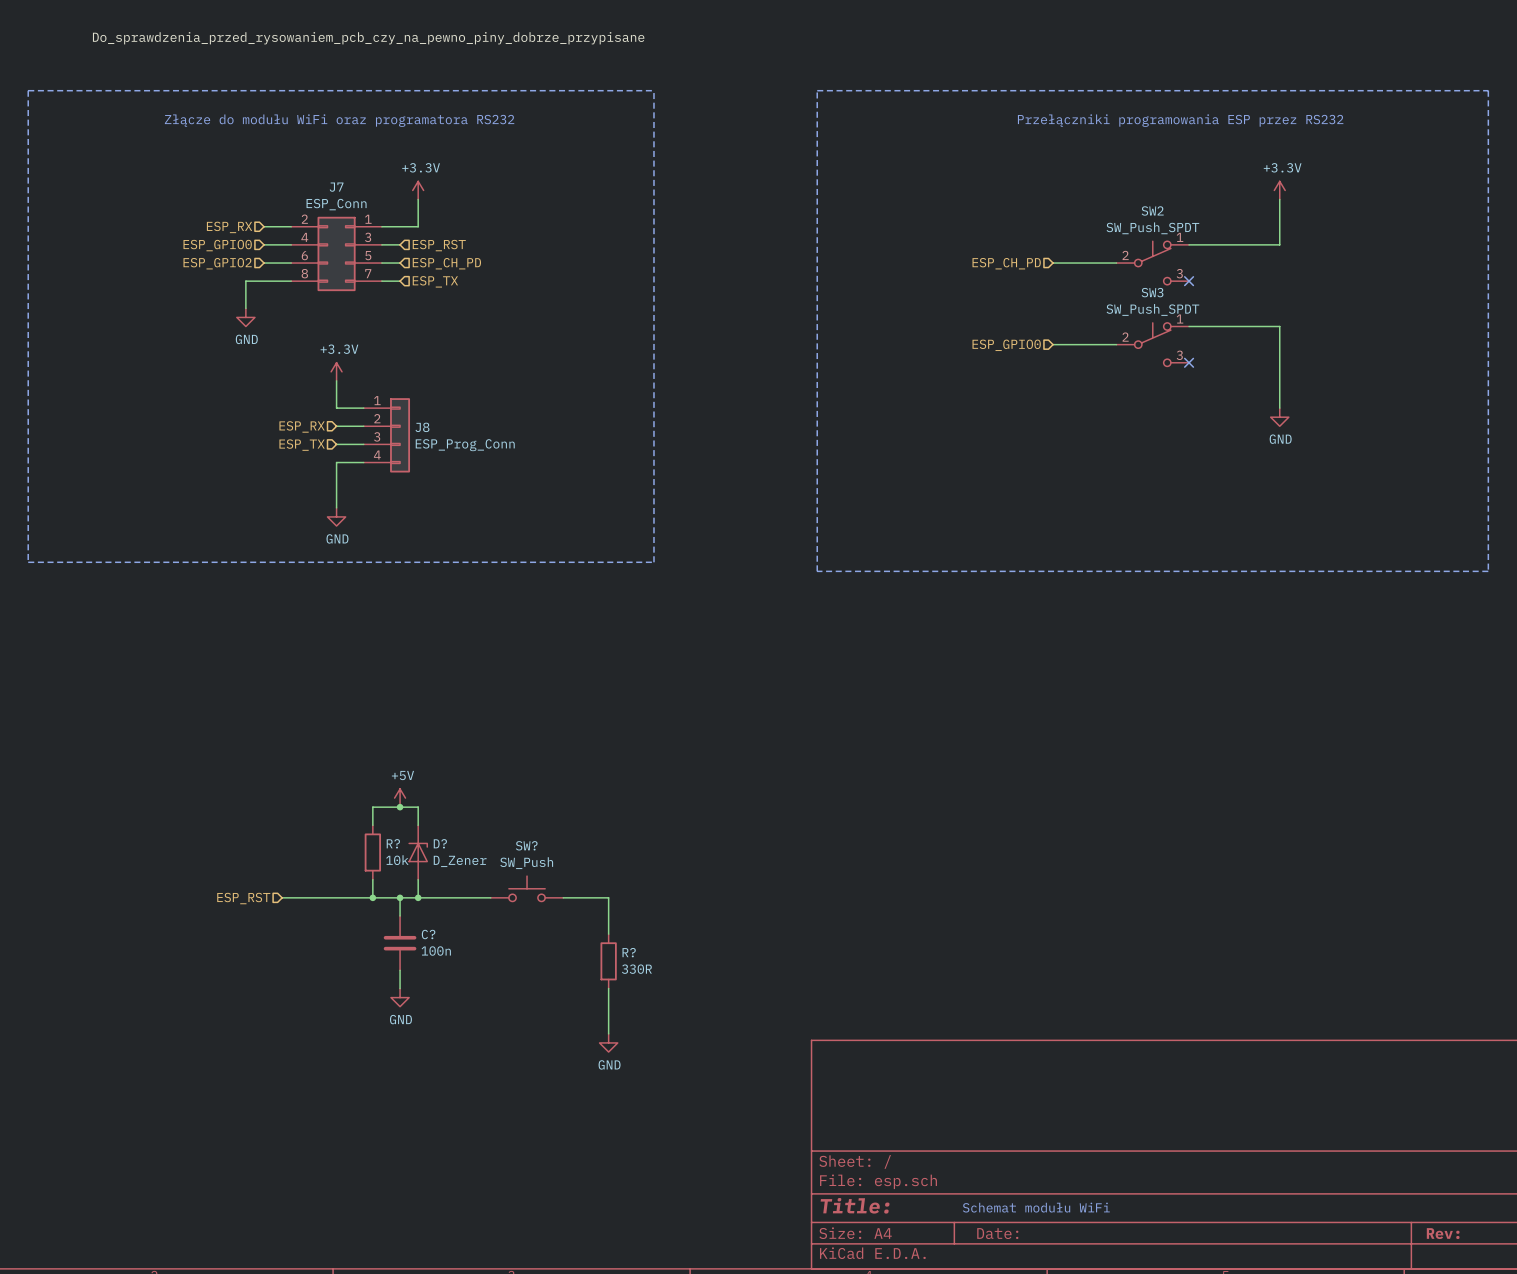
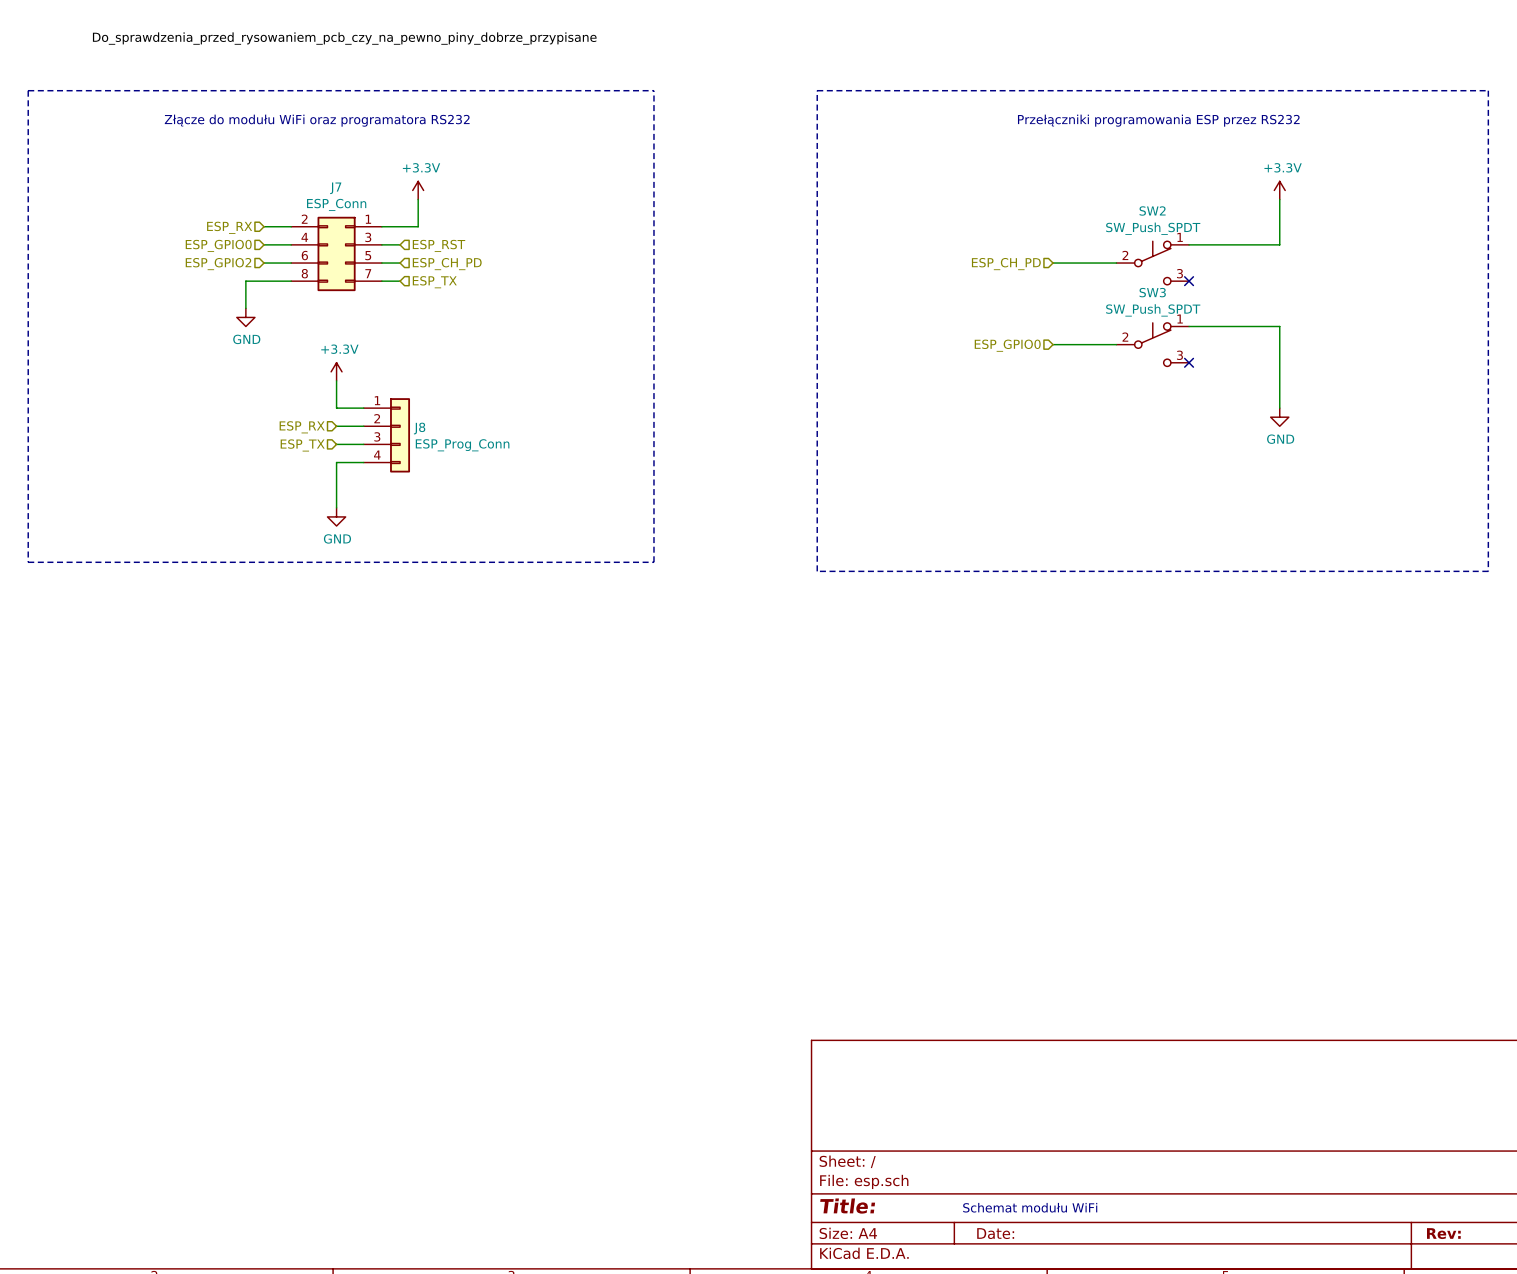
power symbol: +5V (400, 798) -> none
junction: (400, 807) -> none
wire: (372, 825) (372, 807) (418, 807) (418, 825) -> none
R?: 10k (372, 852) -> none
D?: D_Zener (418, 852) -> none
wire: (372, 879) (372, 897) -> none
wire: (418, 879) (418, 897) -> none
SW?: SW_Push (527, 888) -> none
wire: (282, 897) (490, 897) -> none
junction: (372, 897) -> none
wire: (400, 897) (400, 915) -> none
junction: (400, 897) -> none
junction: (418, 897) -> none
wire: (563, 897) (608, 897) (608, 934) -> none
hierarchical label: ESP_RST (243, 898) -> none
C?: 100n (400, 943) -> none
R?: 330R (608, 961) -> none
wire: (400, 970) (400, 988) -> none
wire: (608, 988) (608, 1033) -> none
power symbol: GND (400, 997) -> none
power symbol: GND (608, 1042) -> none

